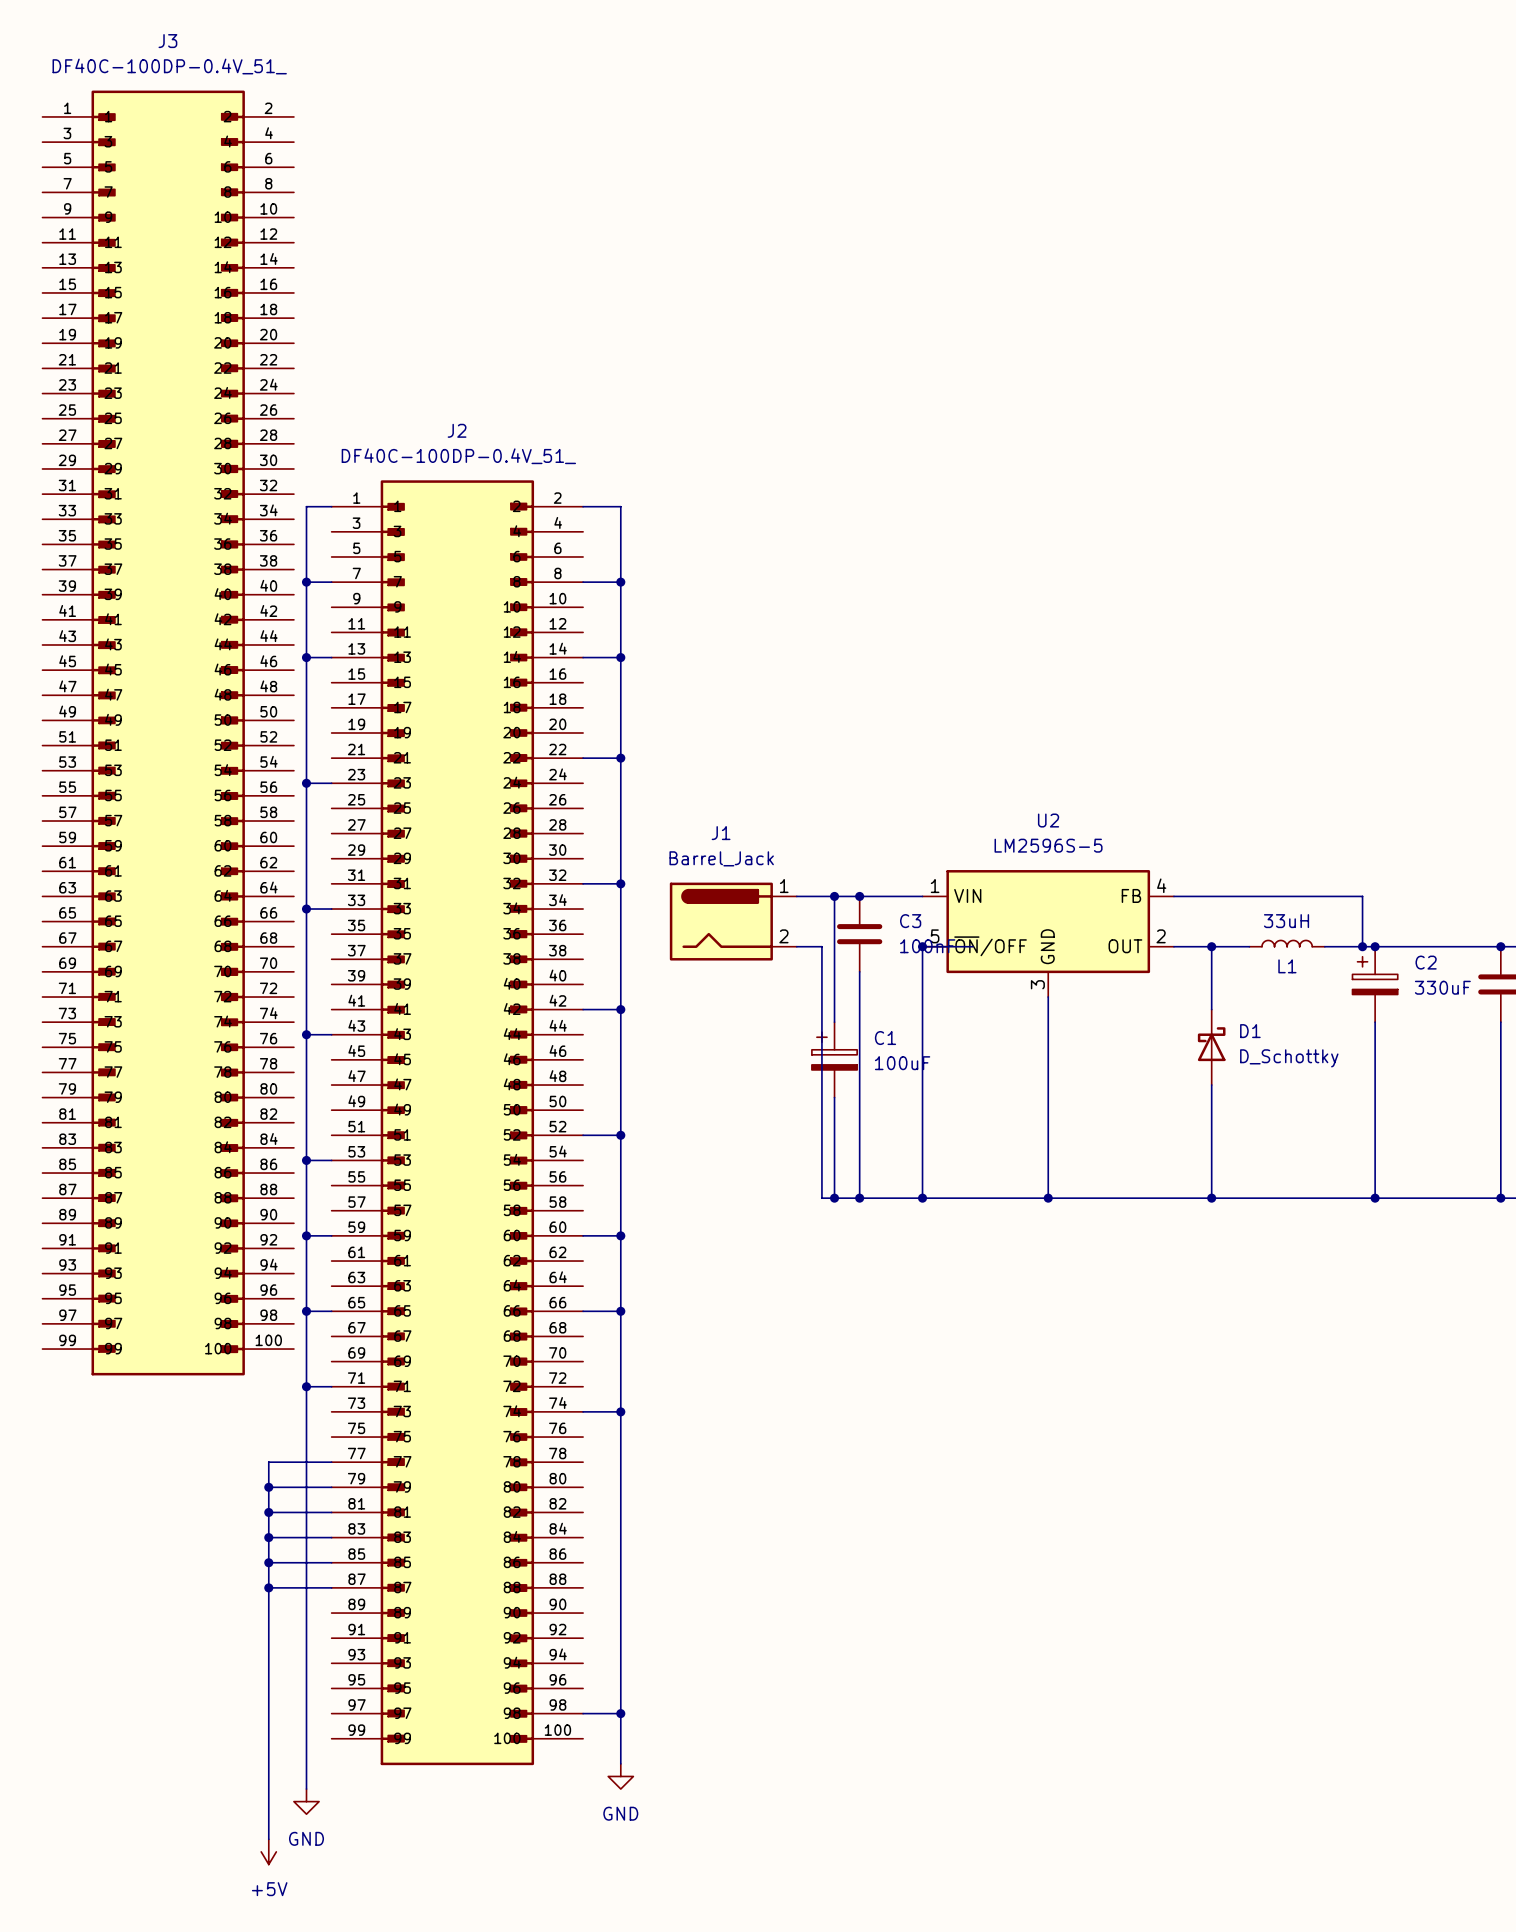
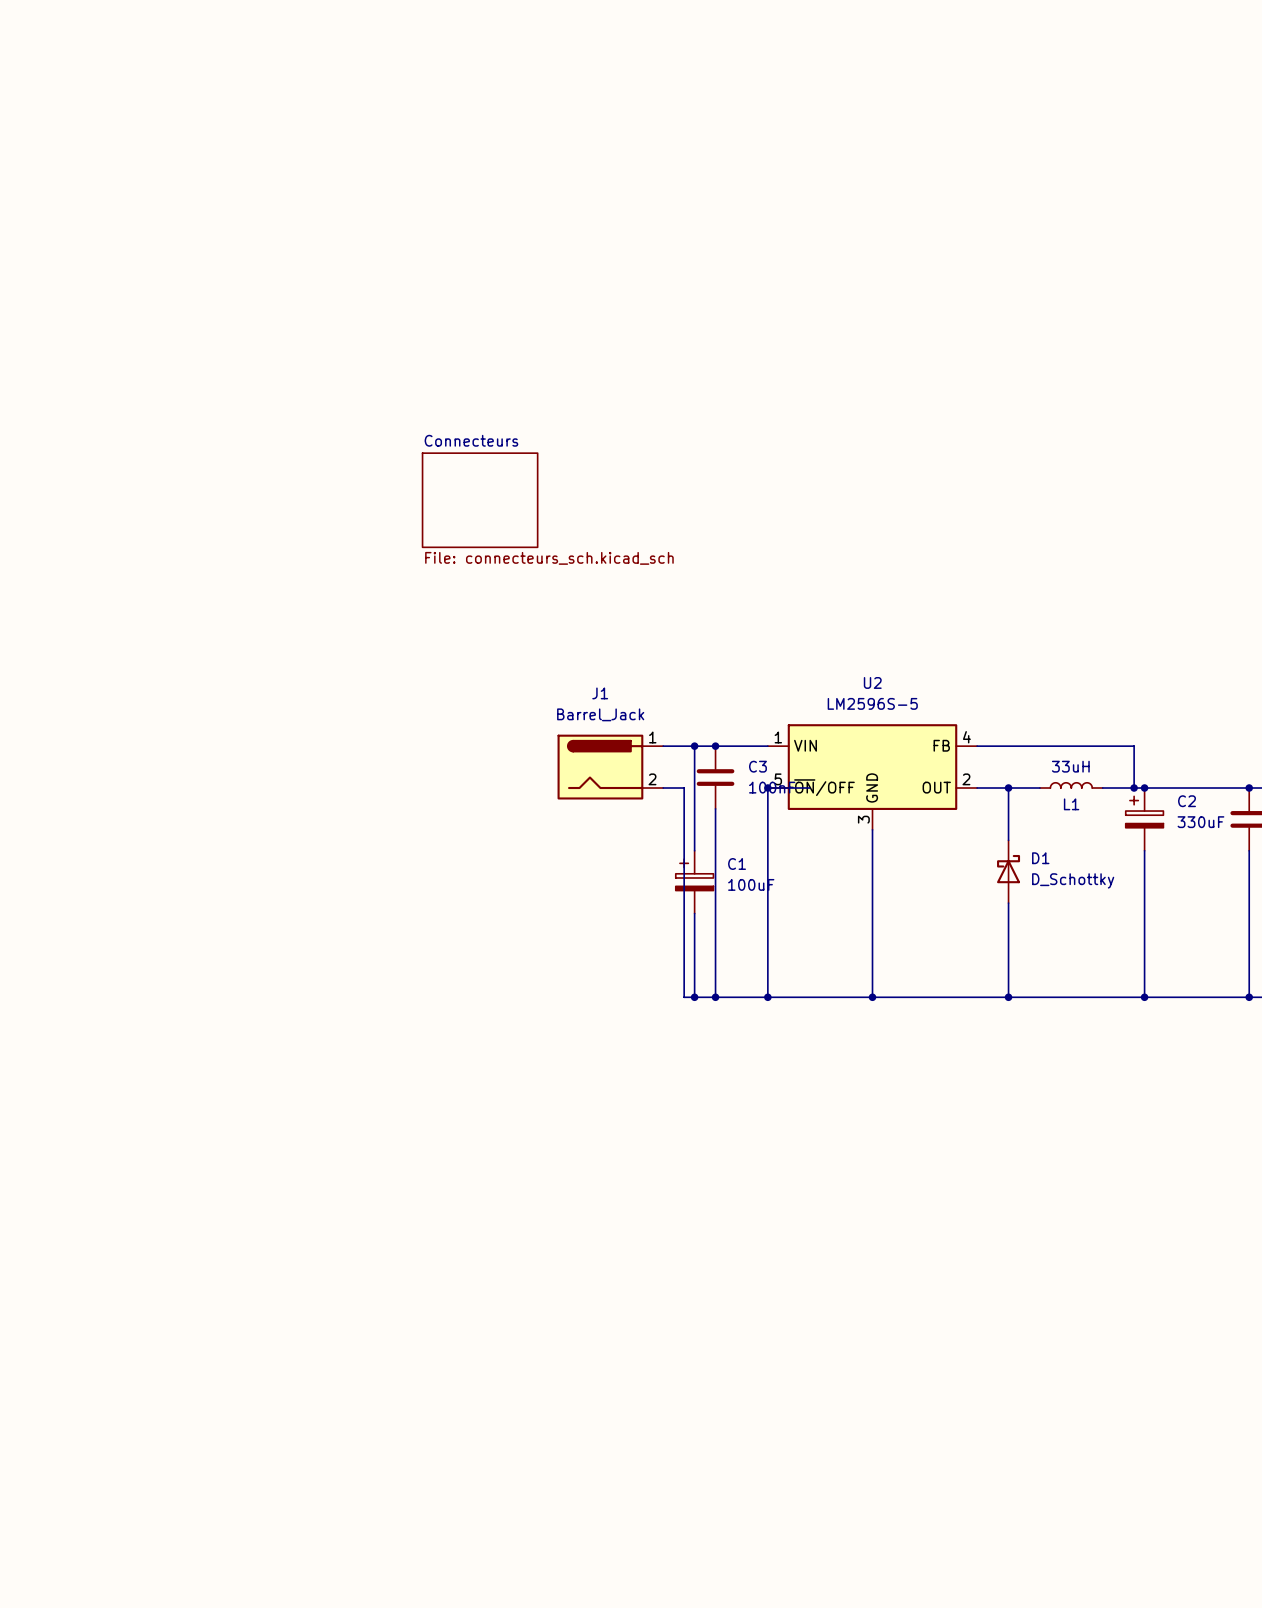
wire: (331, 506) (306, 506) (306, 1789) -> none
wire: (583, 506) (620, 506) (620, 1763) -> none
wire: (306, 582) (331, 582) -> none
junction: (306, 582) -> none
wire: (583, 582) (620, 582) -> none
junction: (620, 582) -> none
sheet Connecteurs: none -> File: connecteurs_sch.kicad_sch (480, 500)
wire: (306, 657) (331, 657) -> none
junction: (306, 657) -> none
junction: (620, 657) -> none
J3: DF40C-100DP-0.4V_51_ (168, 733) -> none
wire: (583, 758) (620, 758) -> none
junction: (620, 758) -> none
wire: (306, 783) (331, 783) -> none
junction: (306, 783) -> none
wire: (583, 883) (620, 883) -> none
junction: (620, 883) -> none
wire: (306, 909) (331, 909) -> none
junction: (306, 909) -> none
wire: (583, 1009) (620, 1009) -> none
junction: (620, 1009) -> none
wire: (306, 1034) (331, 1034) -> none
junction: (306, 1034) -> none
J2: DF40C-100DP-0.4V_51_ (457, 1122) -> none
wire: (583, 1135) (620, 1135) -> none
junction: (620, 1135) -> none
wire: (306, 1160) (331, 1160) -> none
junction: (306, 1160) -> none
wire: (306, 1235) (331, 1235) -> none
junction: (306, 1235) -> none
wire: (583, 1235) (620, 1235) -> none
junction: (620, 1235) -> none
wire: (306, 1311) (331, 1311) -> none
junction: (306, 1311) -> none
wire: (583, 1311) (620, 1311) -> none
junction: (620, 1311) -> none
wire: (306, 1386) (331, 1386) -> none
junction: (306, 1386) -> none
wire: (583, 1411) (620, 1411) -> none
junction: (620, 1411) -> none
wire: (331, 1462) (268, 1462) (268, 1839) -> none
wire: (268, 1487) (331, 1487) -> none
junction: (268, 1487) -> none
wire: (268, 1512) (331, 1512) -> none
junction: (268, 1512) -> none
wire: (268, 1537) (331, 1537) -> none
junction: (268, 1537) -> none
wire: (268, 1562) (331, 1562) -> none
junction: (268, 1562) -> none
wire: (268, 1587) (331, 1587) -> none
junction: (268, 1587) -> none
wire: (583, 1713) (620, 1713) -> none
junction: (620, 1713) -> none
power symbol: GND (620, 1776) -> none
power symbol: GND (306, 1801) -> none
power symbol: +5V (268, 1851) -> none

